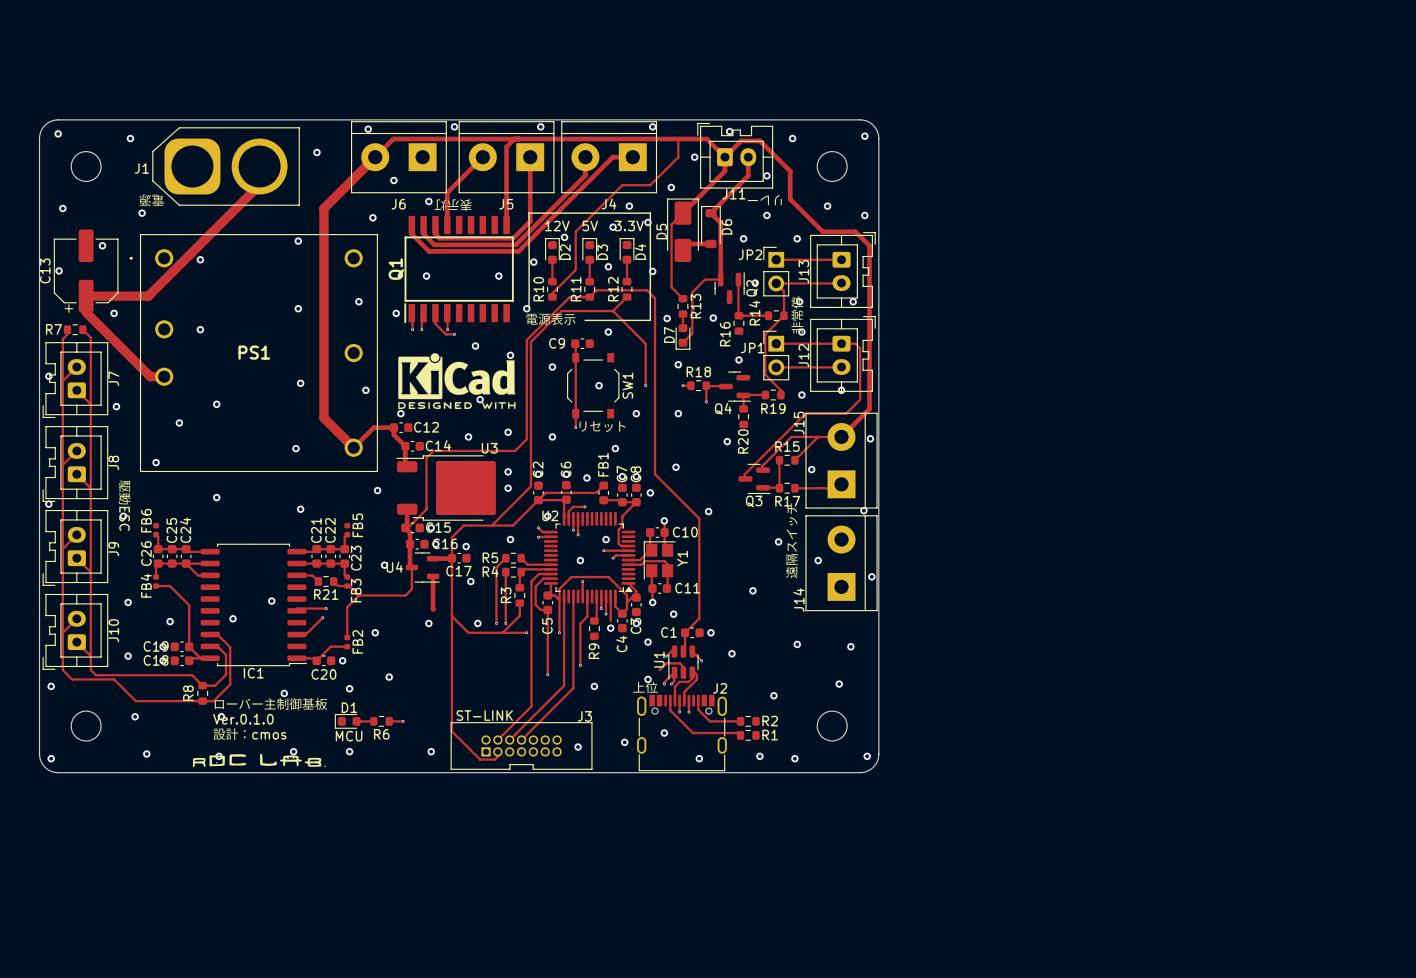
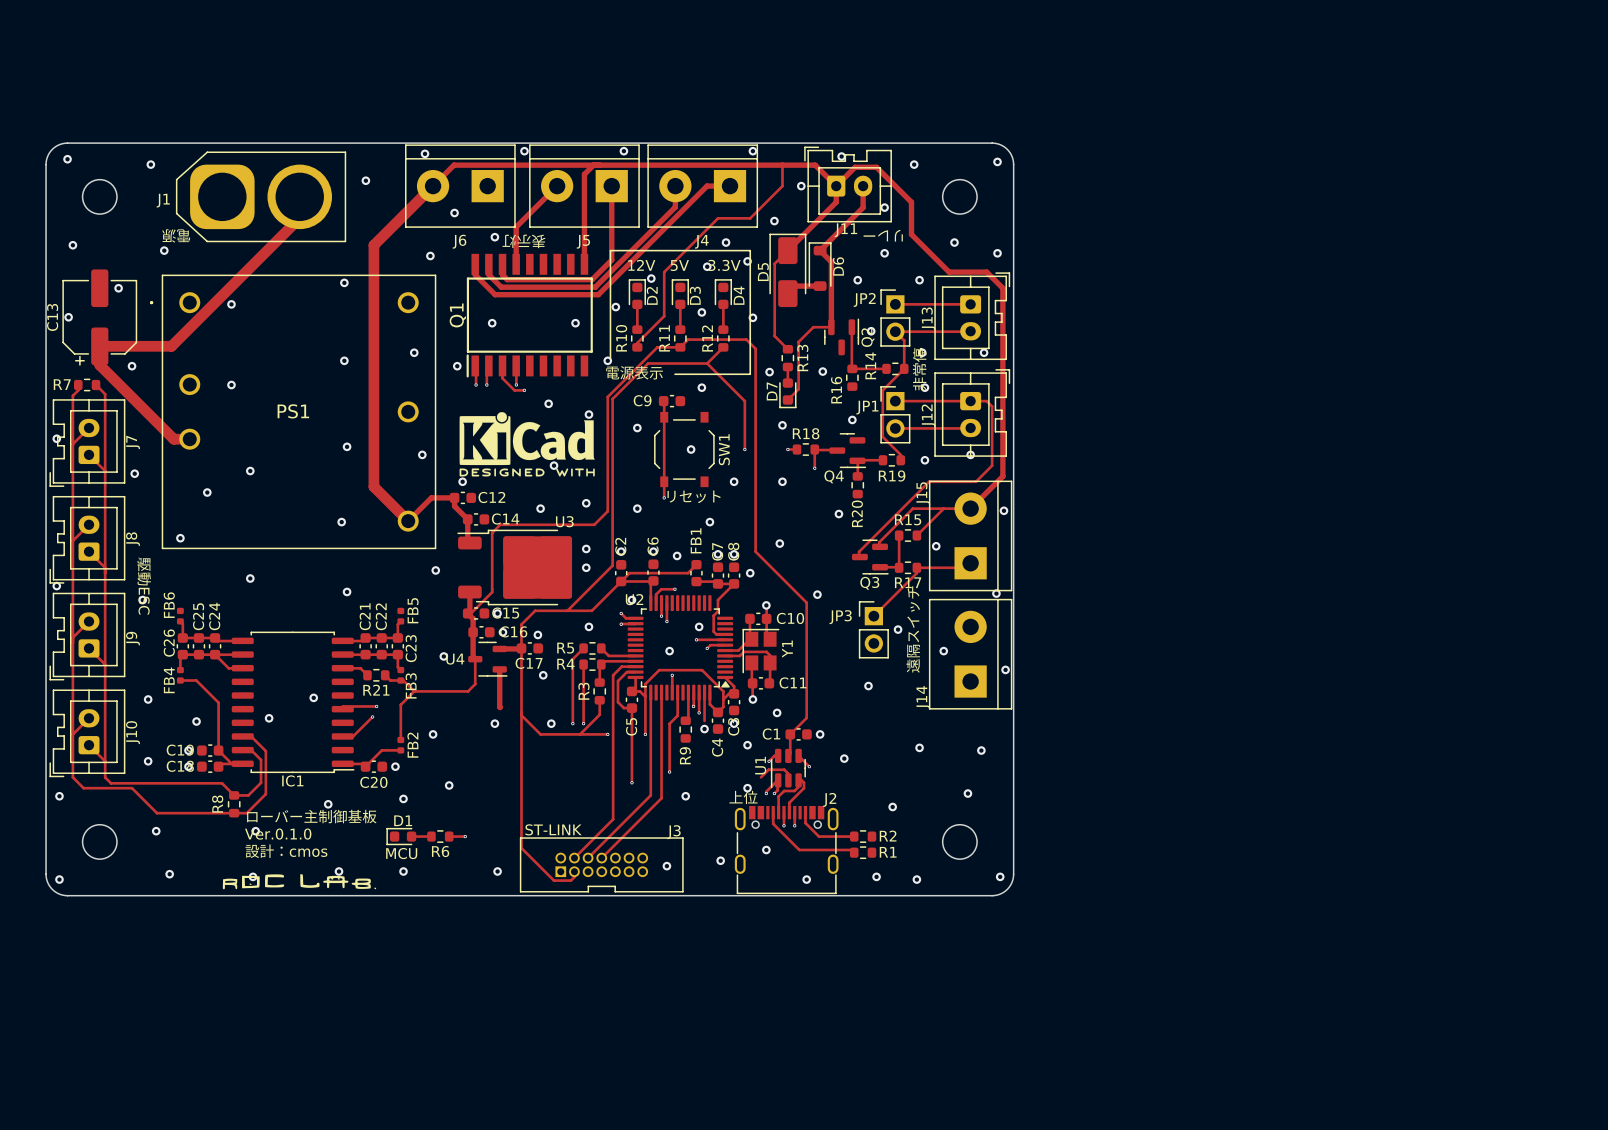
track: none -> (916, 567) (916, 573) (873, 616)
JP3: none -> (873, 629)

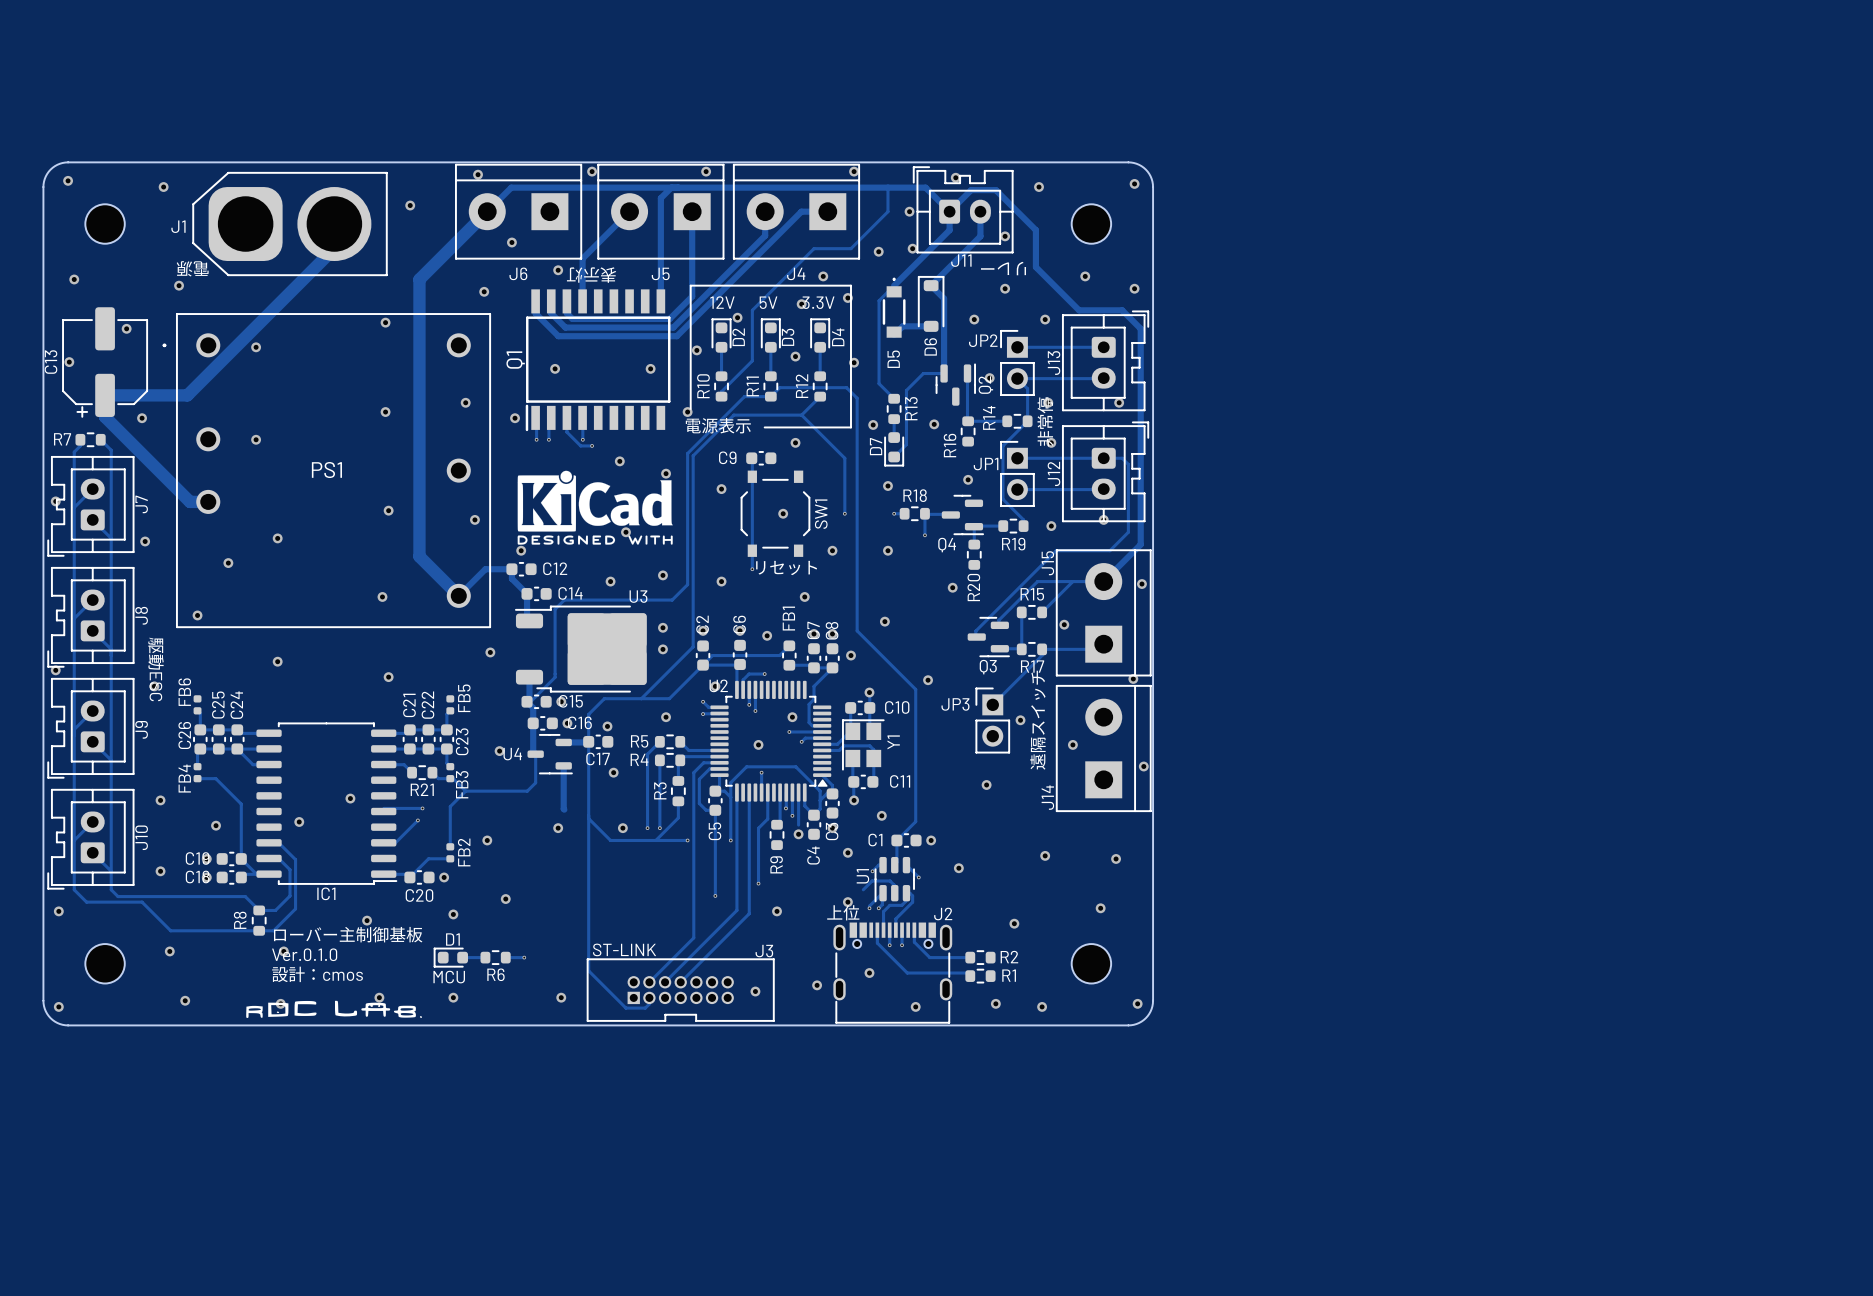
via: none -> (912, 248)
D5 footprint: [769, 233, 807, 308] -> [882, 278, 906, 338]
D6 name position: D6 (838, 266) -> D6 (930, 346)
D5 name position: D5 (763, 272) -> D5 (893, 359)

